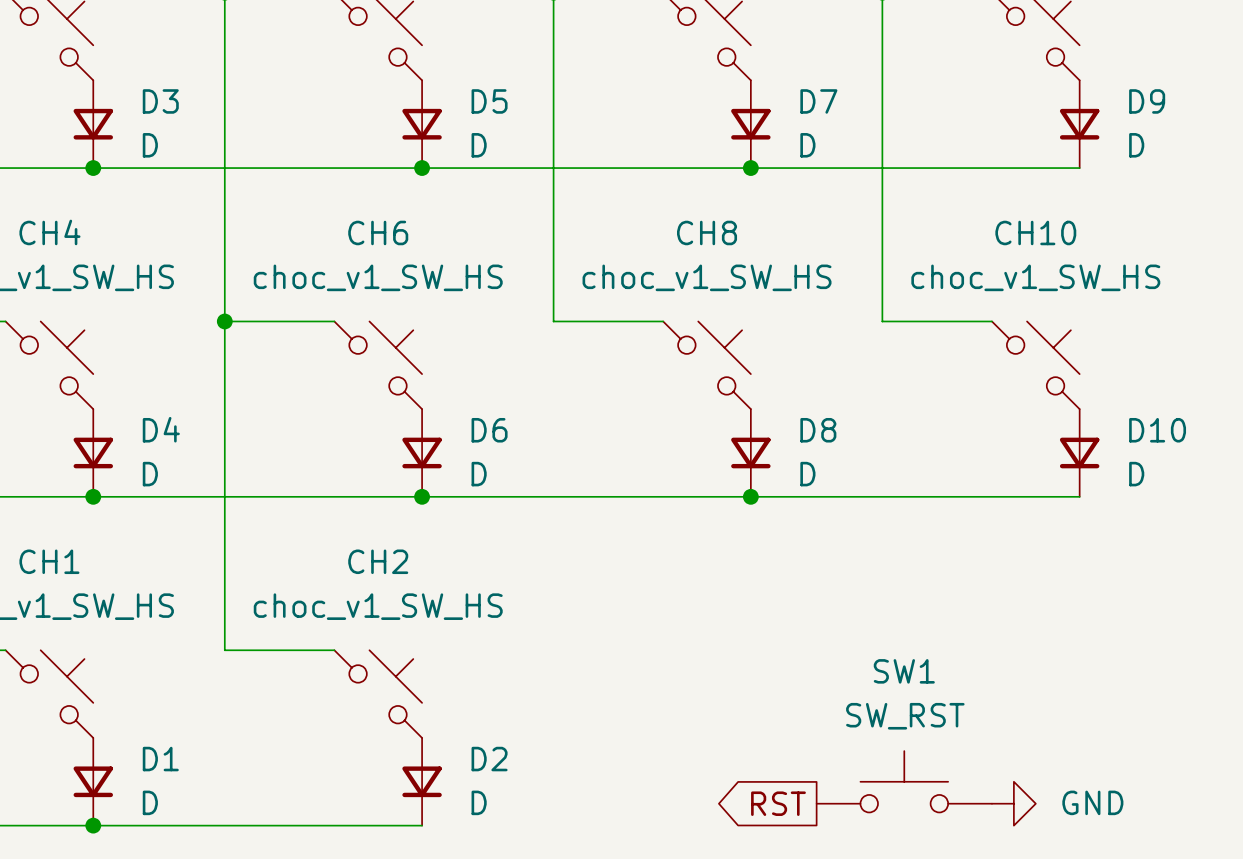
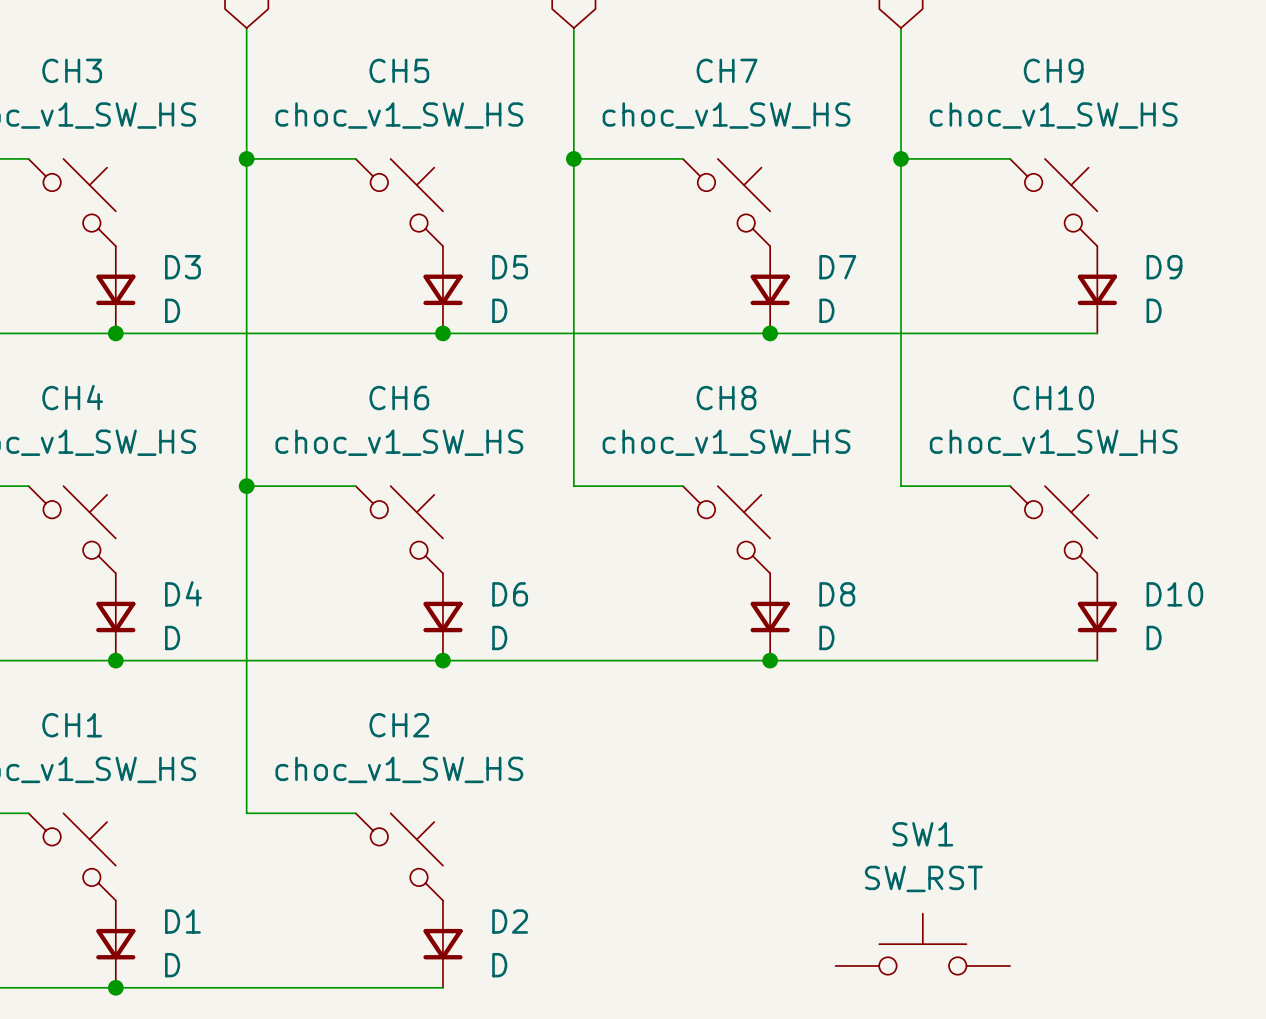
global label: RST (778, 803) -> none
power symbol: GND (1013, 803) -> none

